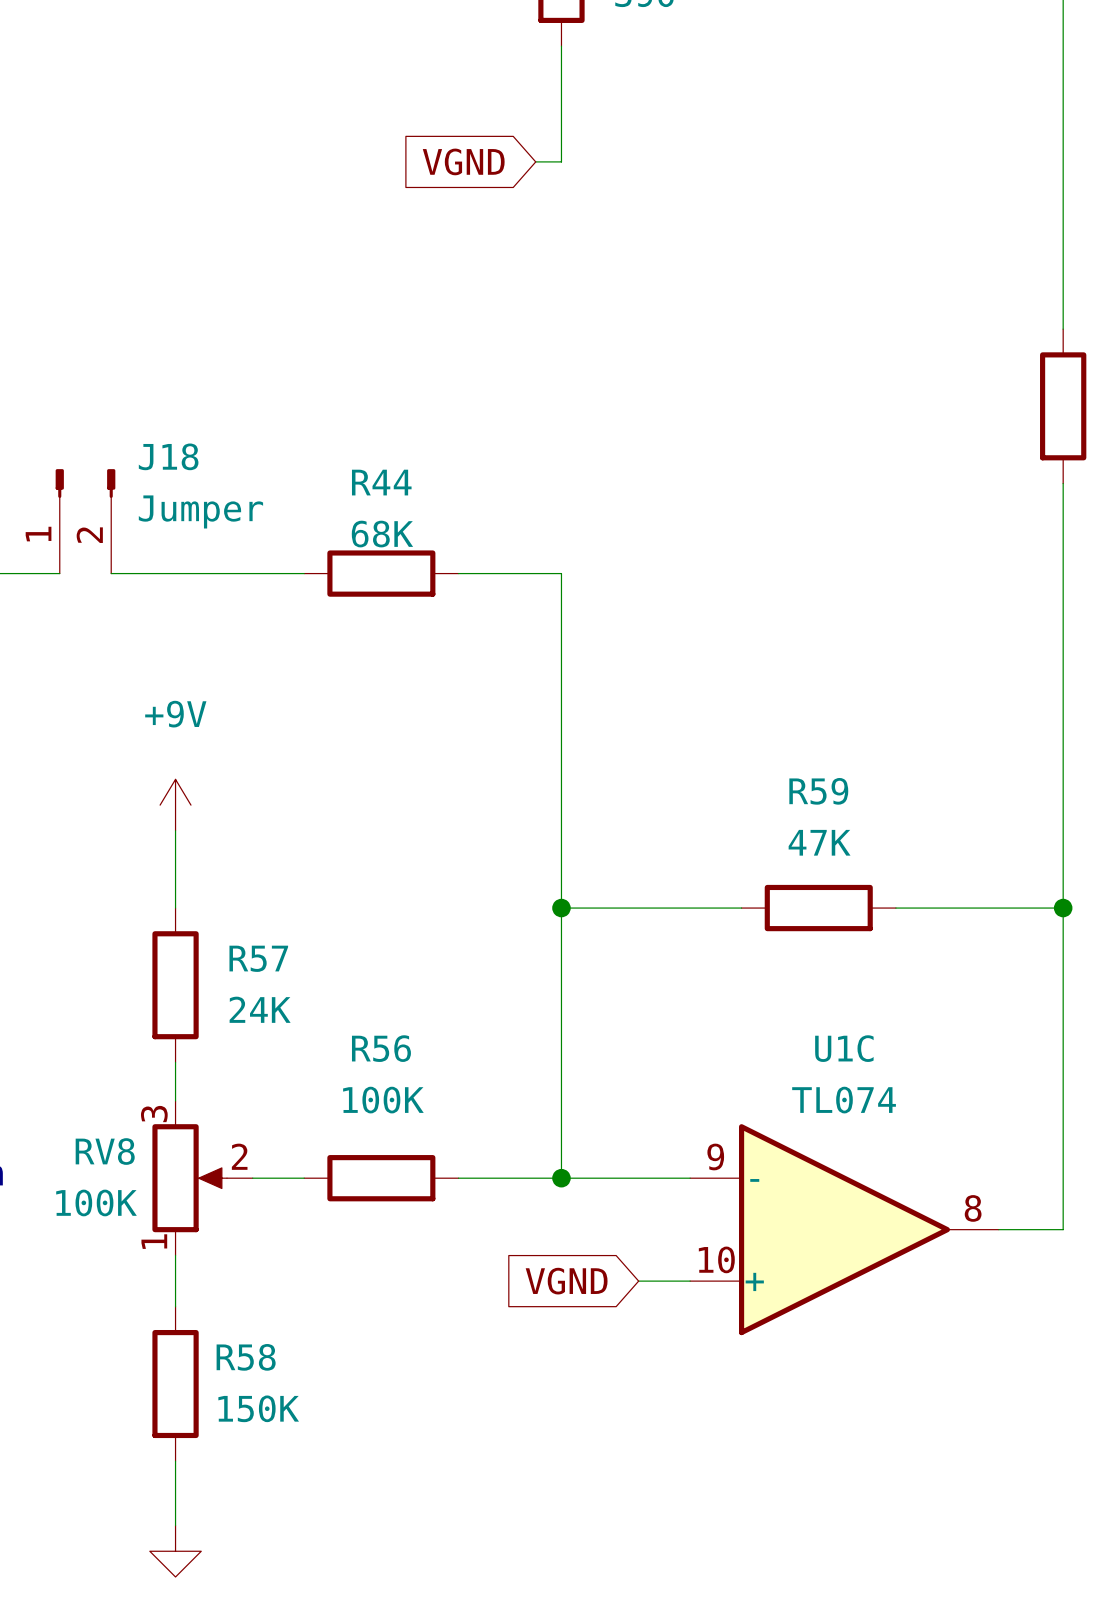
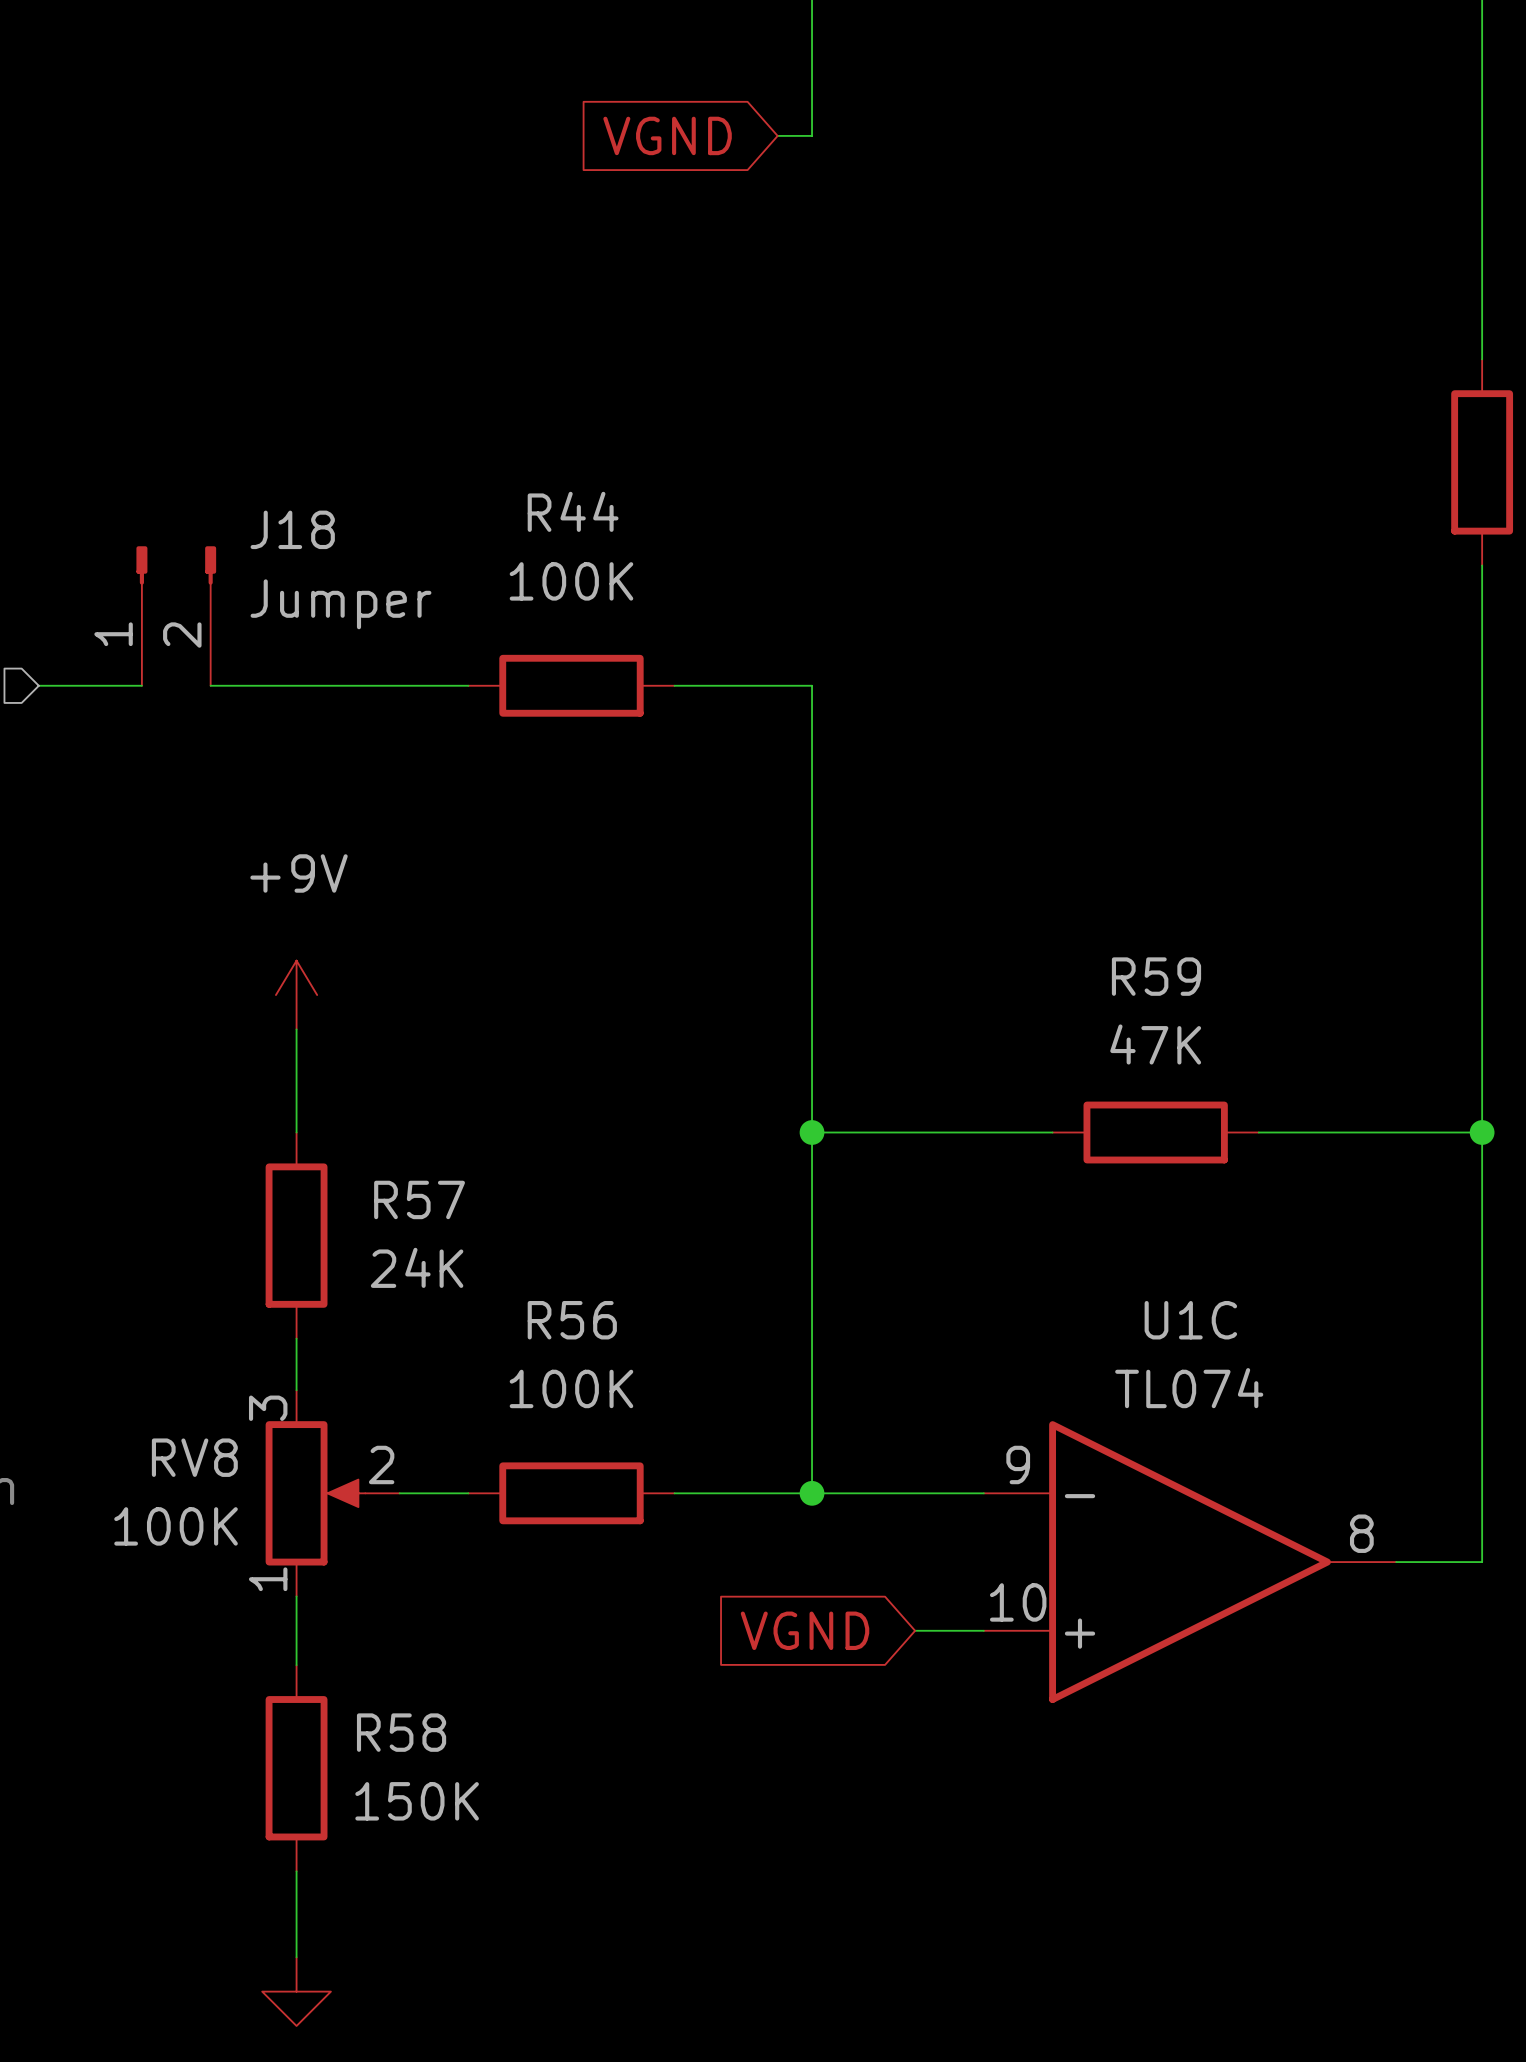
R44 name position: R44 (381, 482) -> R44 (573, 511)
R44 value: 68K (382, 534) -> 100K (571, 581)

